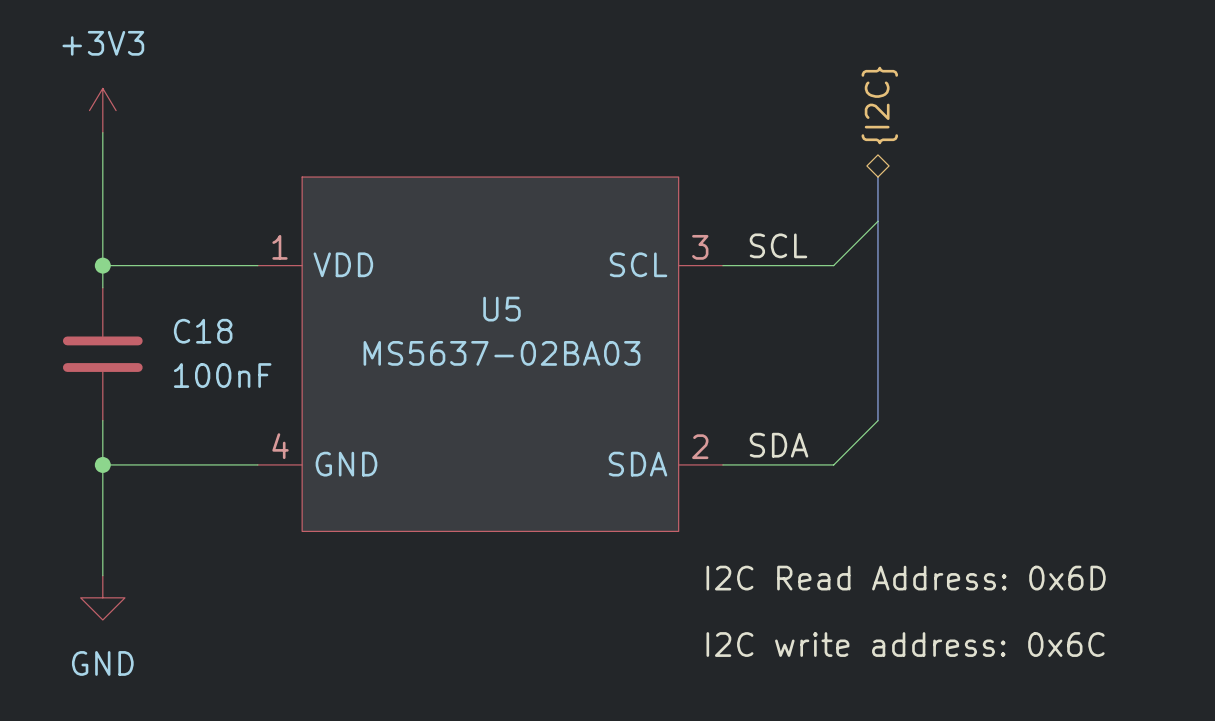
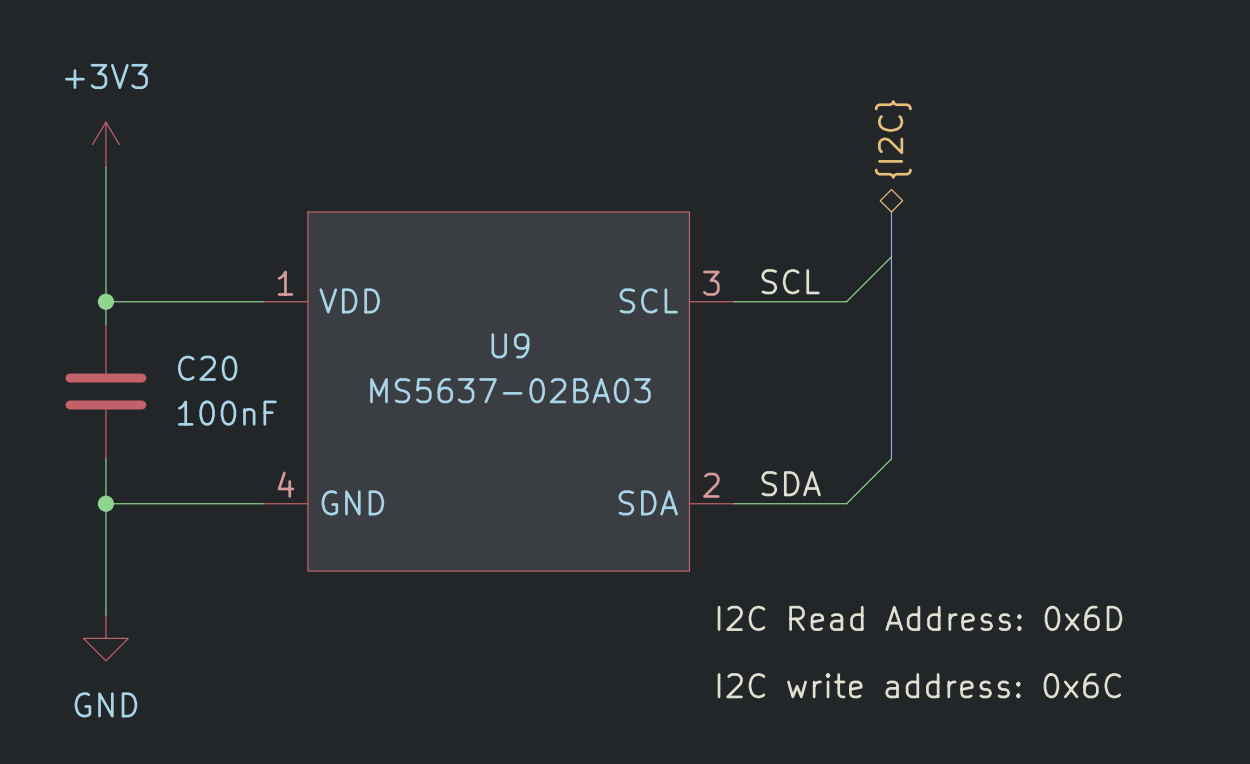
U5 name: U5 (501, 309) -> U9 (510, 345)
C18 name: C18 (203, 331) -> C20 (207, 368)

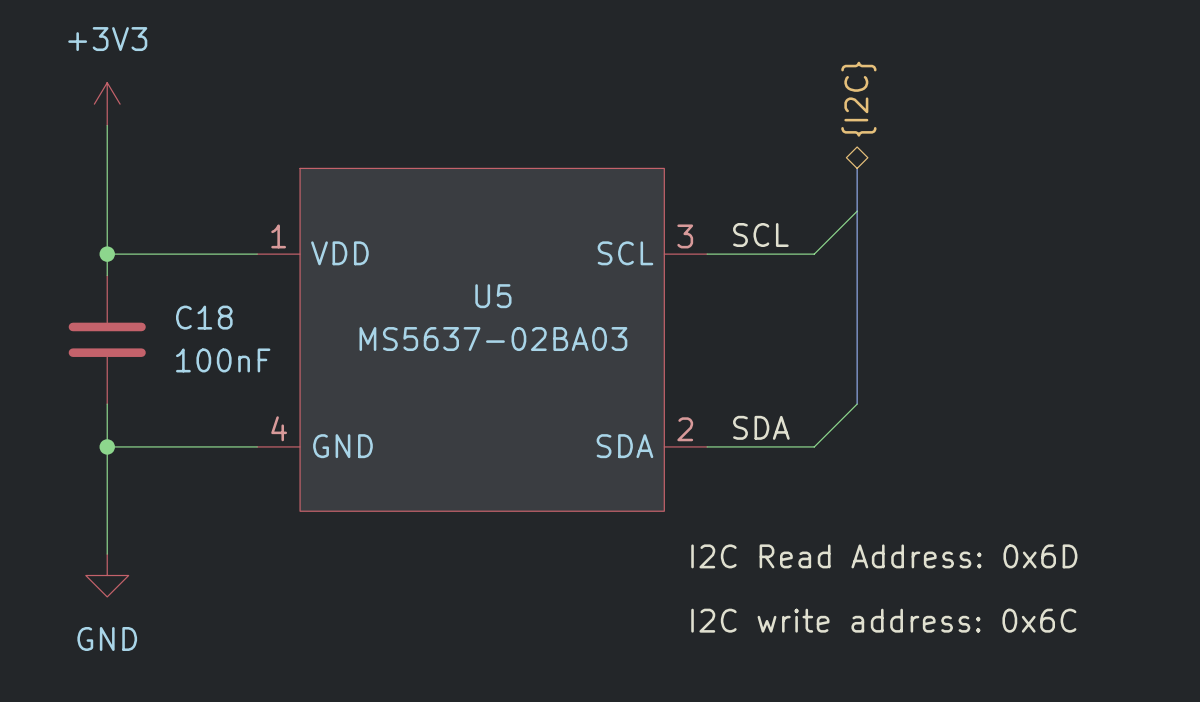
U9 name: U9 (510, 345) -> U5 (493, 296)
C20 name: C20 (207, 368) -> C18 (204, 317)

